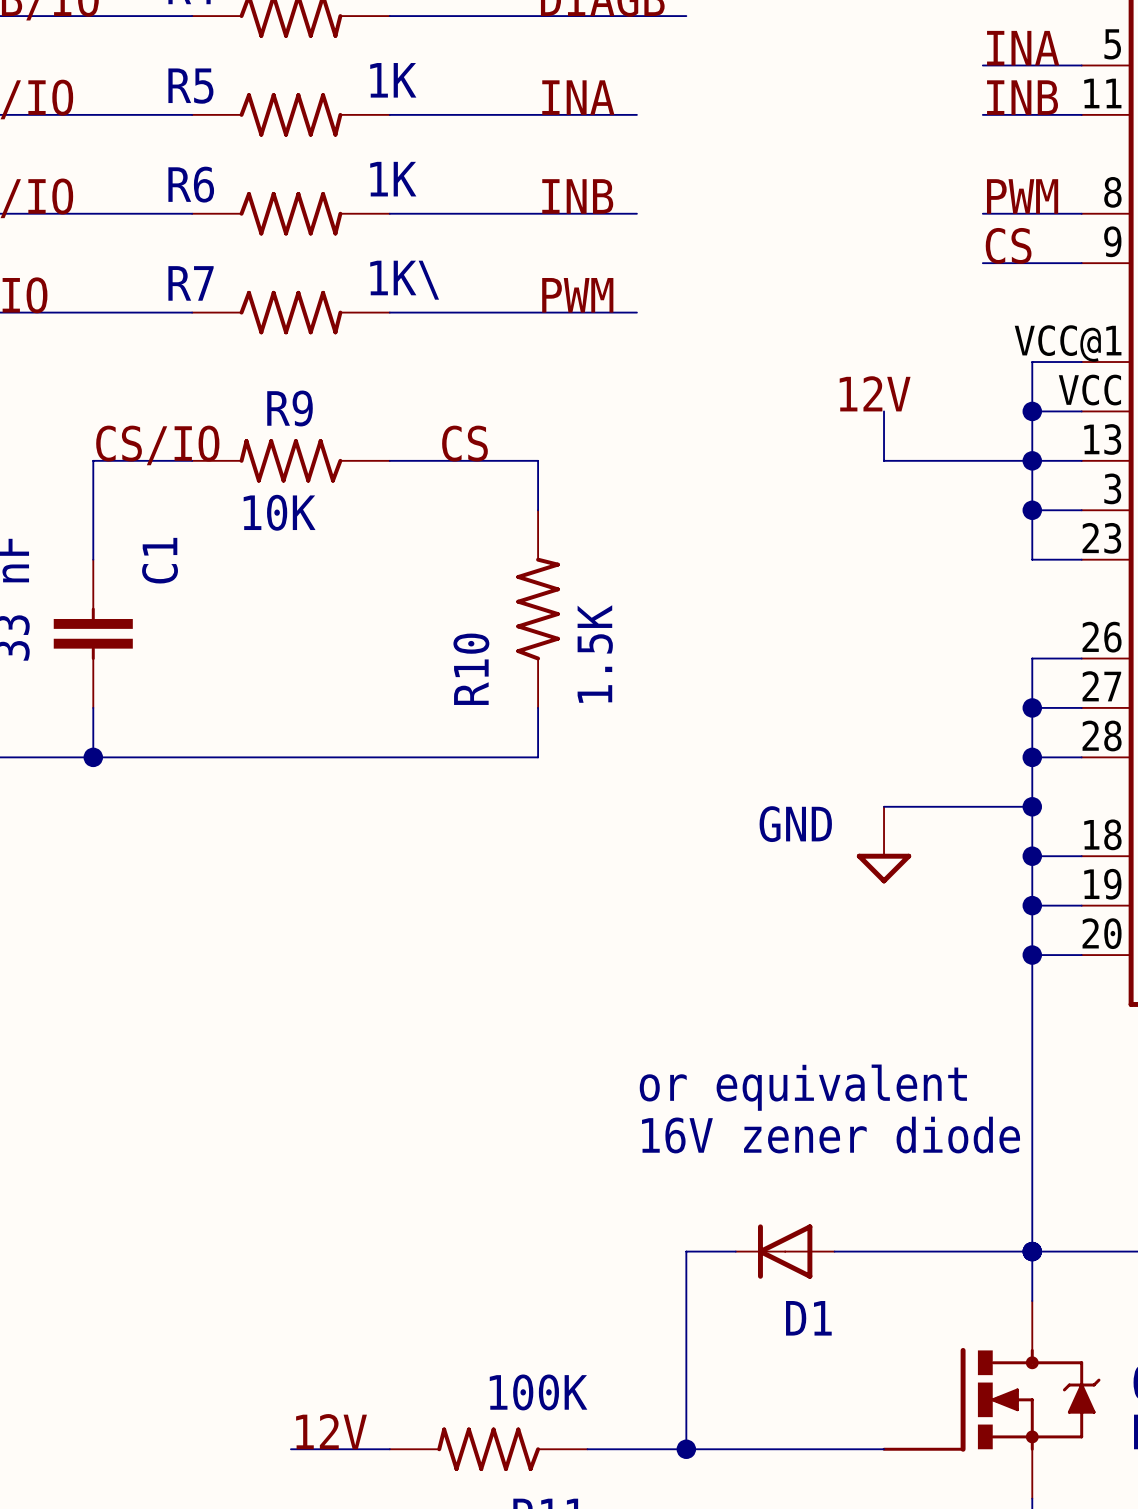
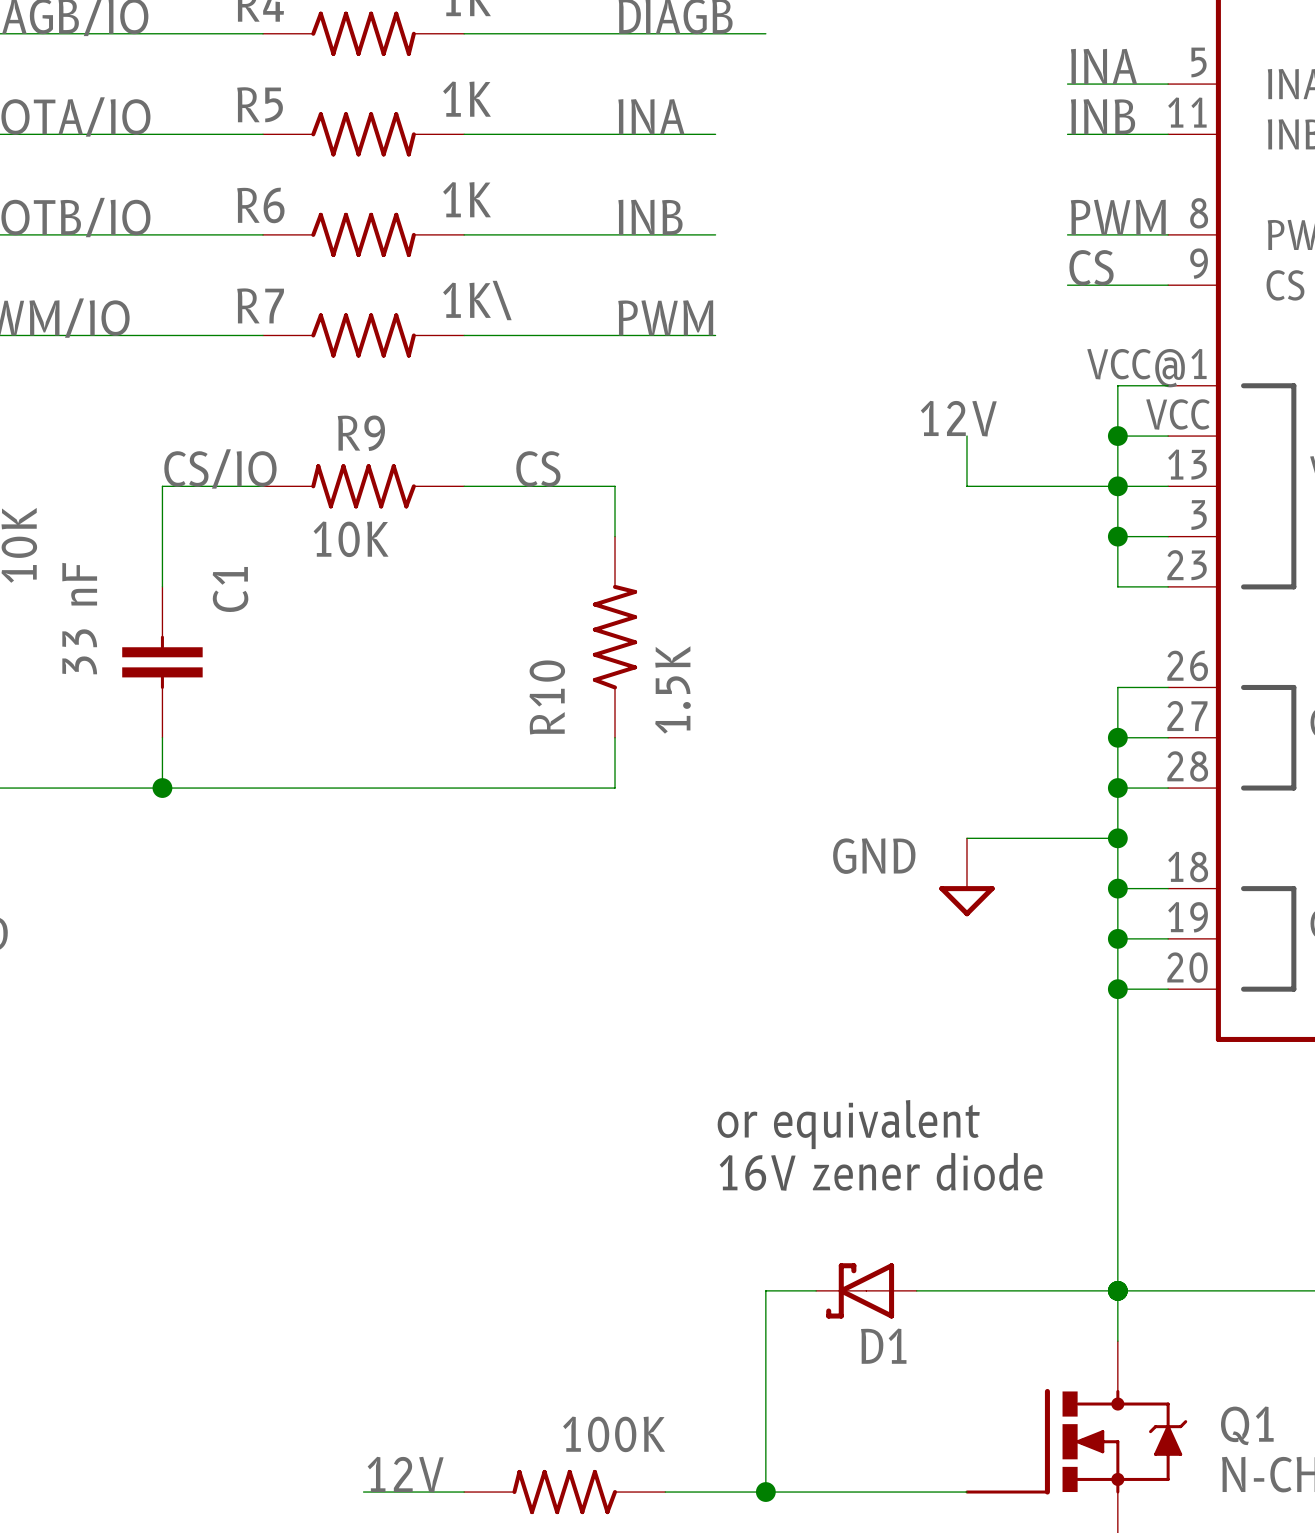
D1 symbol: [735, 1224, 835, 1279] -> [816, 1263, 917, 1319]
D1 name position: D1 (808, 1318) -> D1 (883, 1346)

